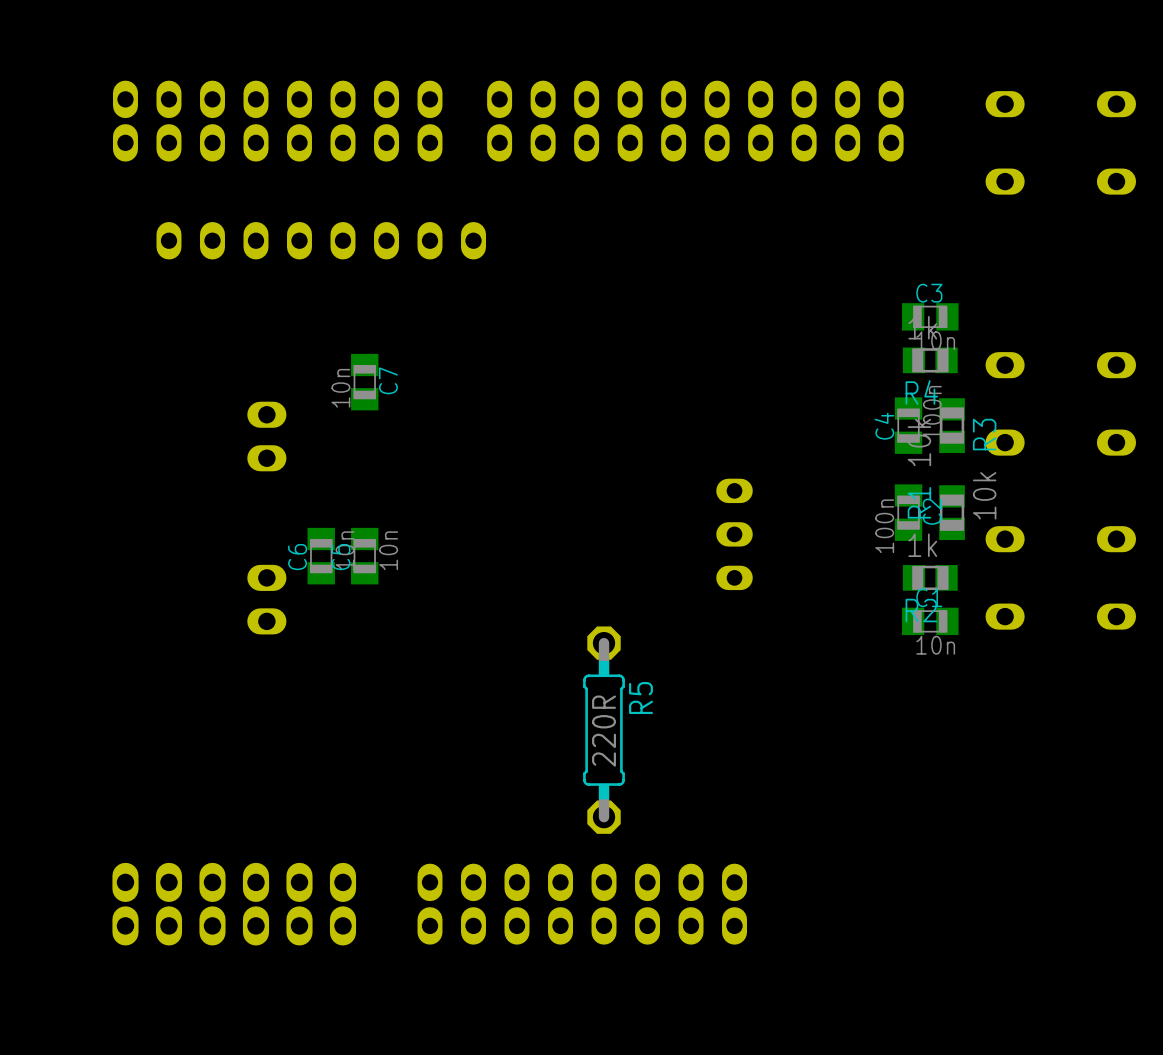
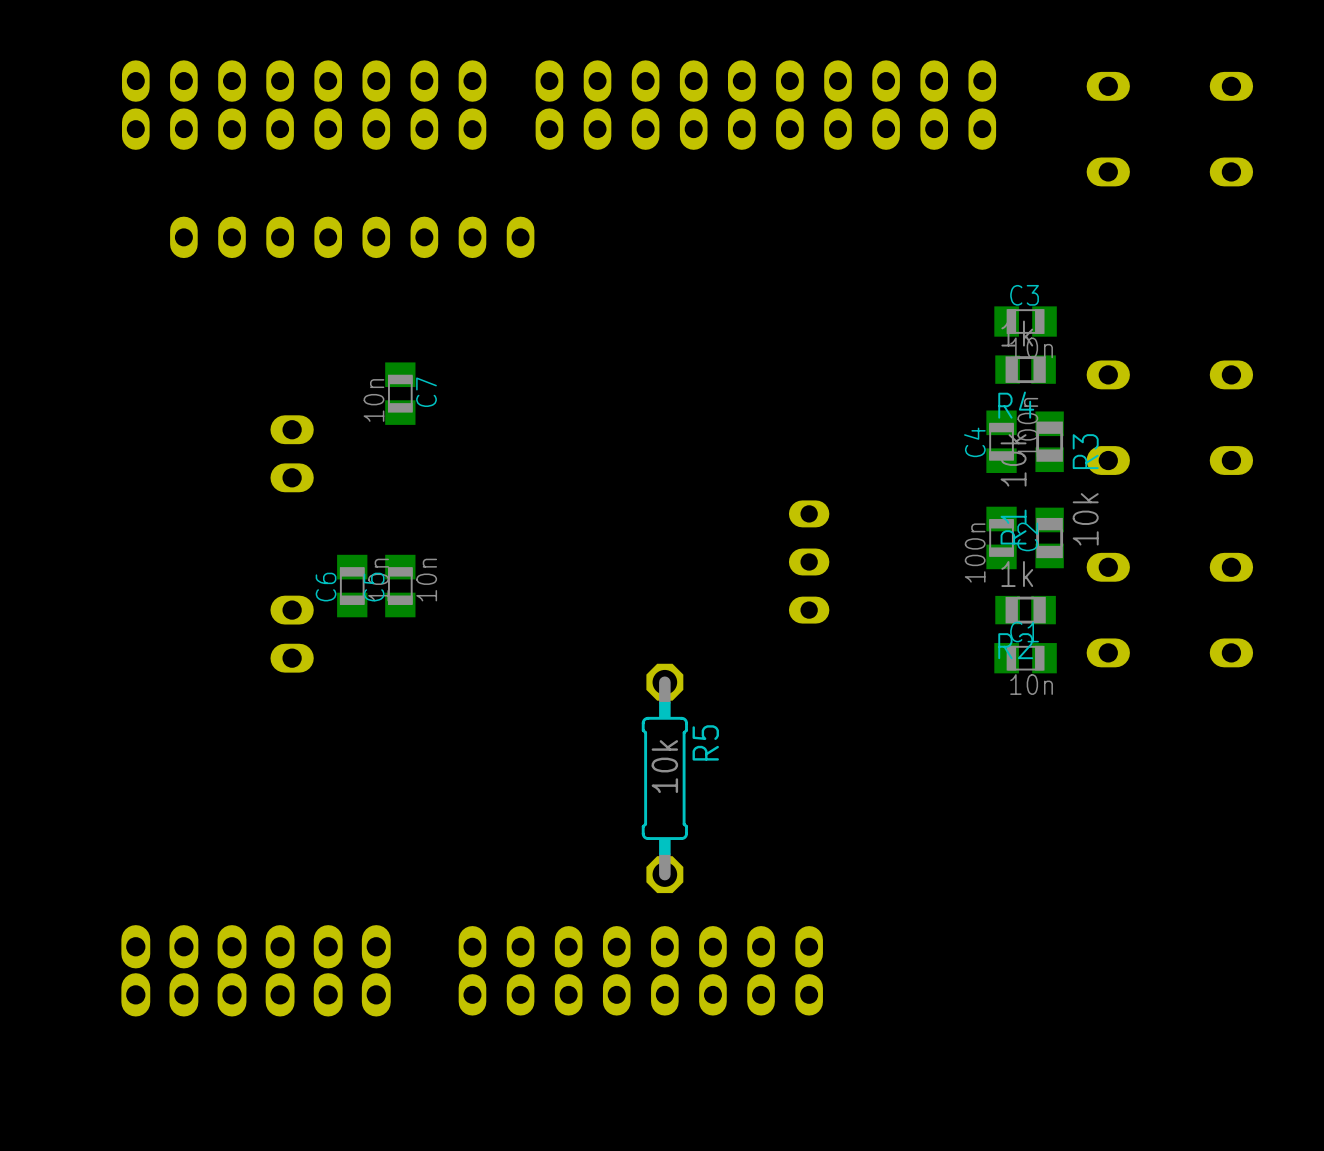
R5 value: 220R (604, 731) -> 10k (664, 766)

